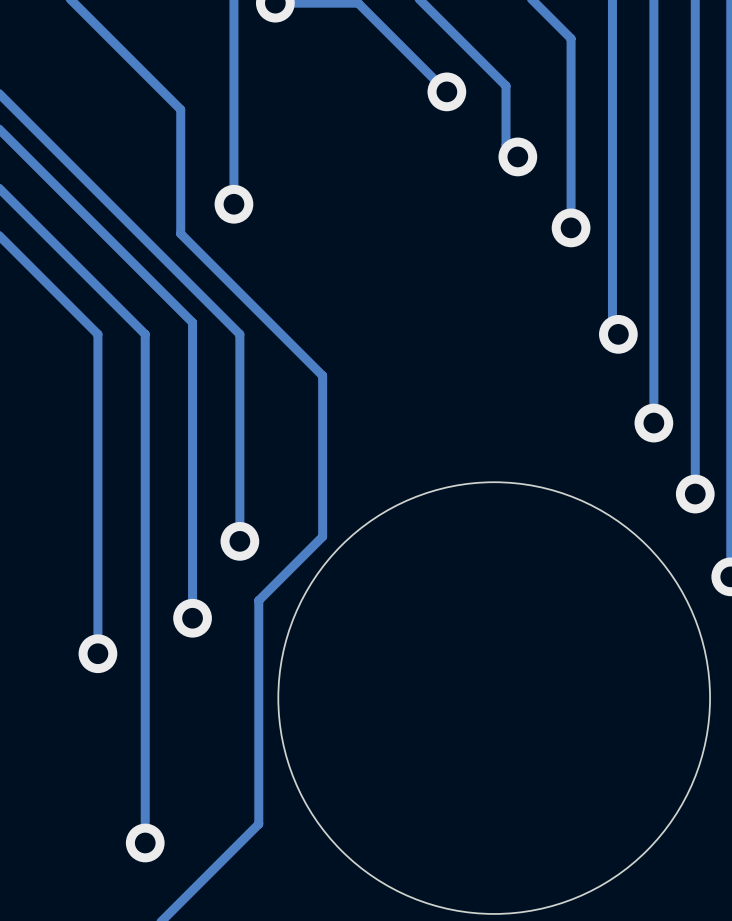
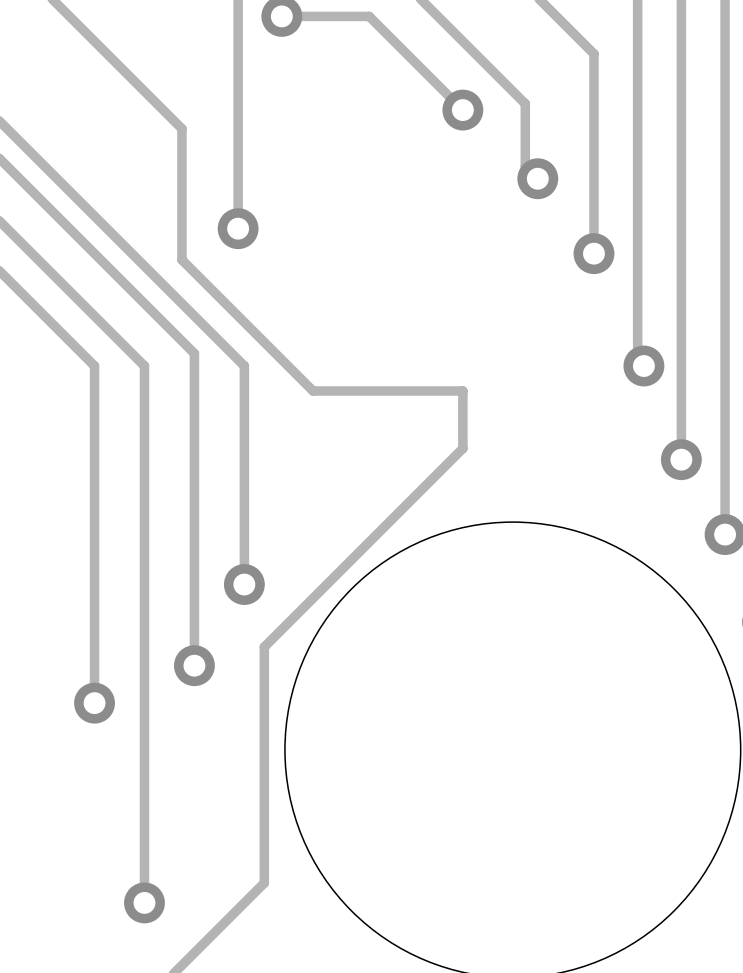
track: (304, 358) (322, 375) (322, 536) -> (313, 390) (462, 390) (462, 448) (331, 579)

